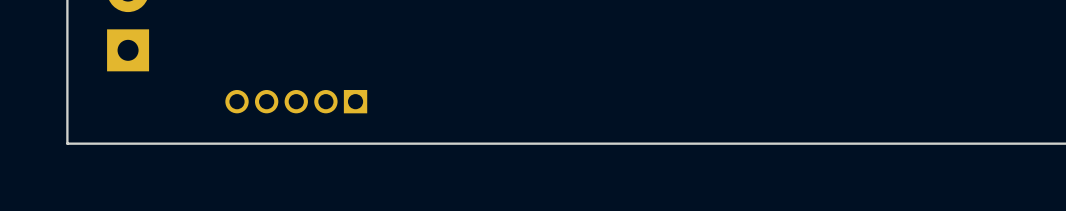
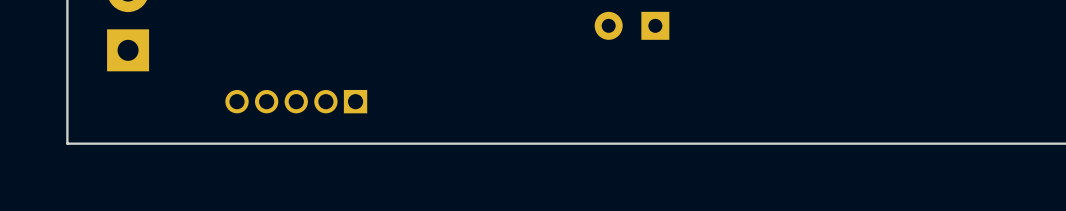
part: none -> (632, 25)

